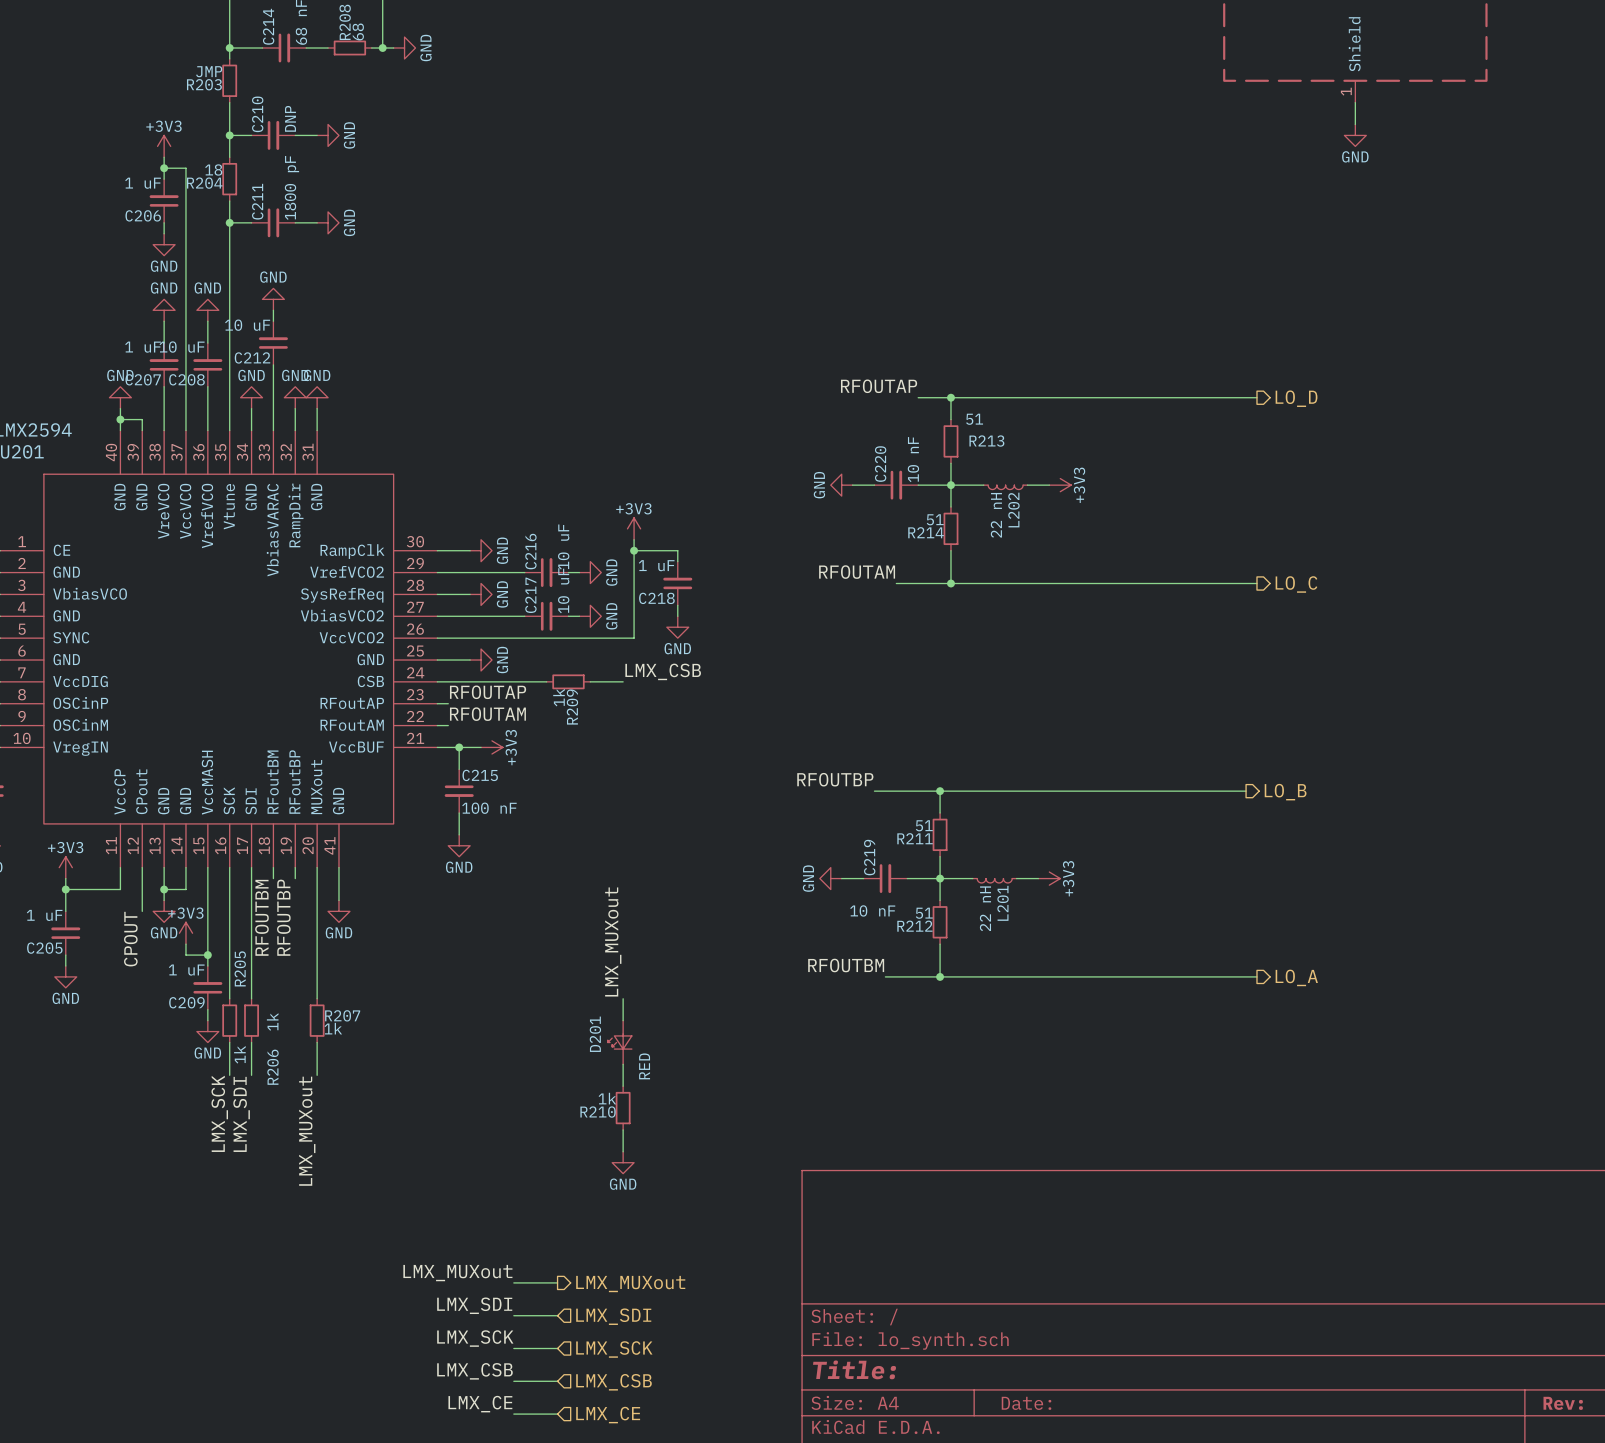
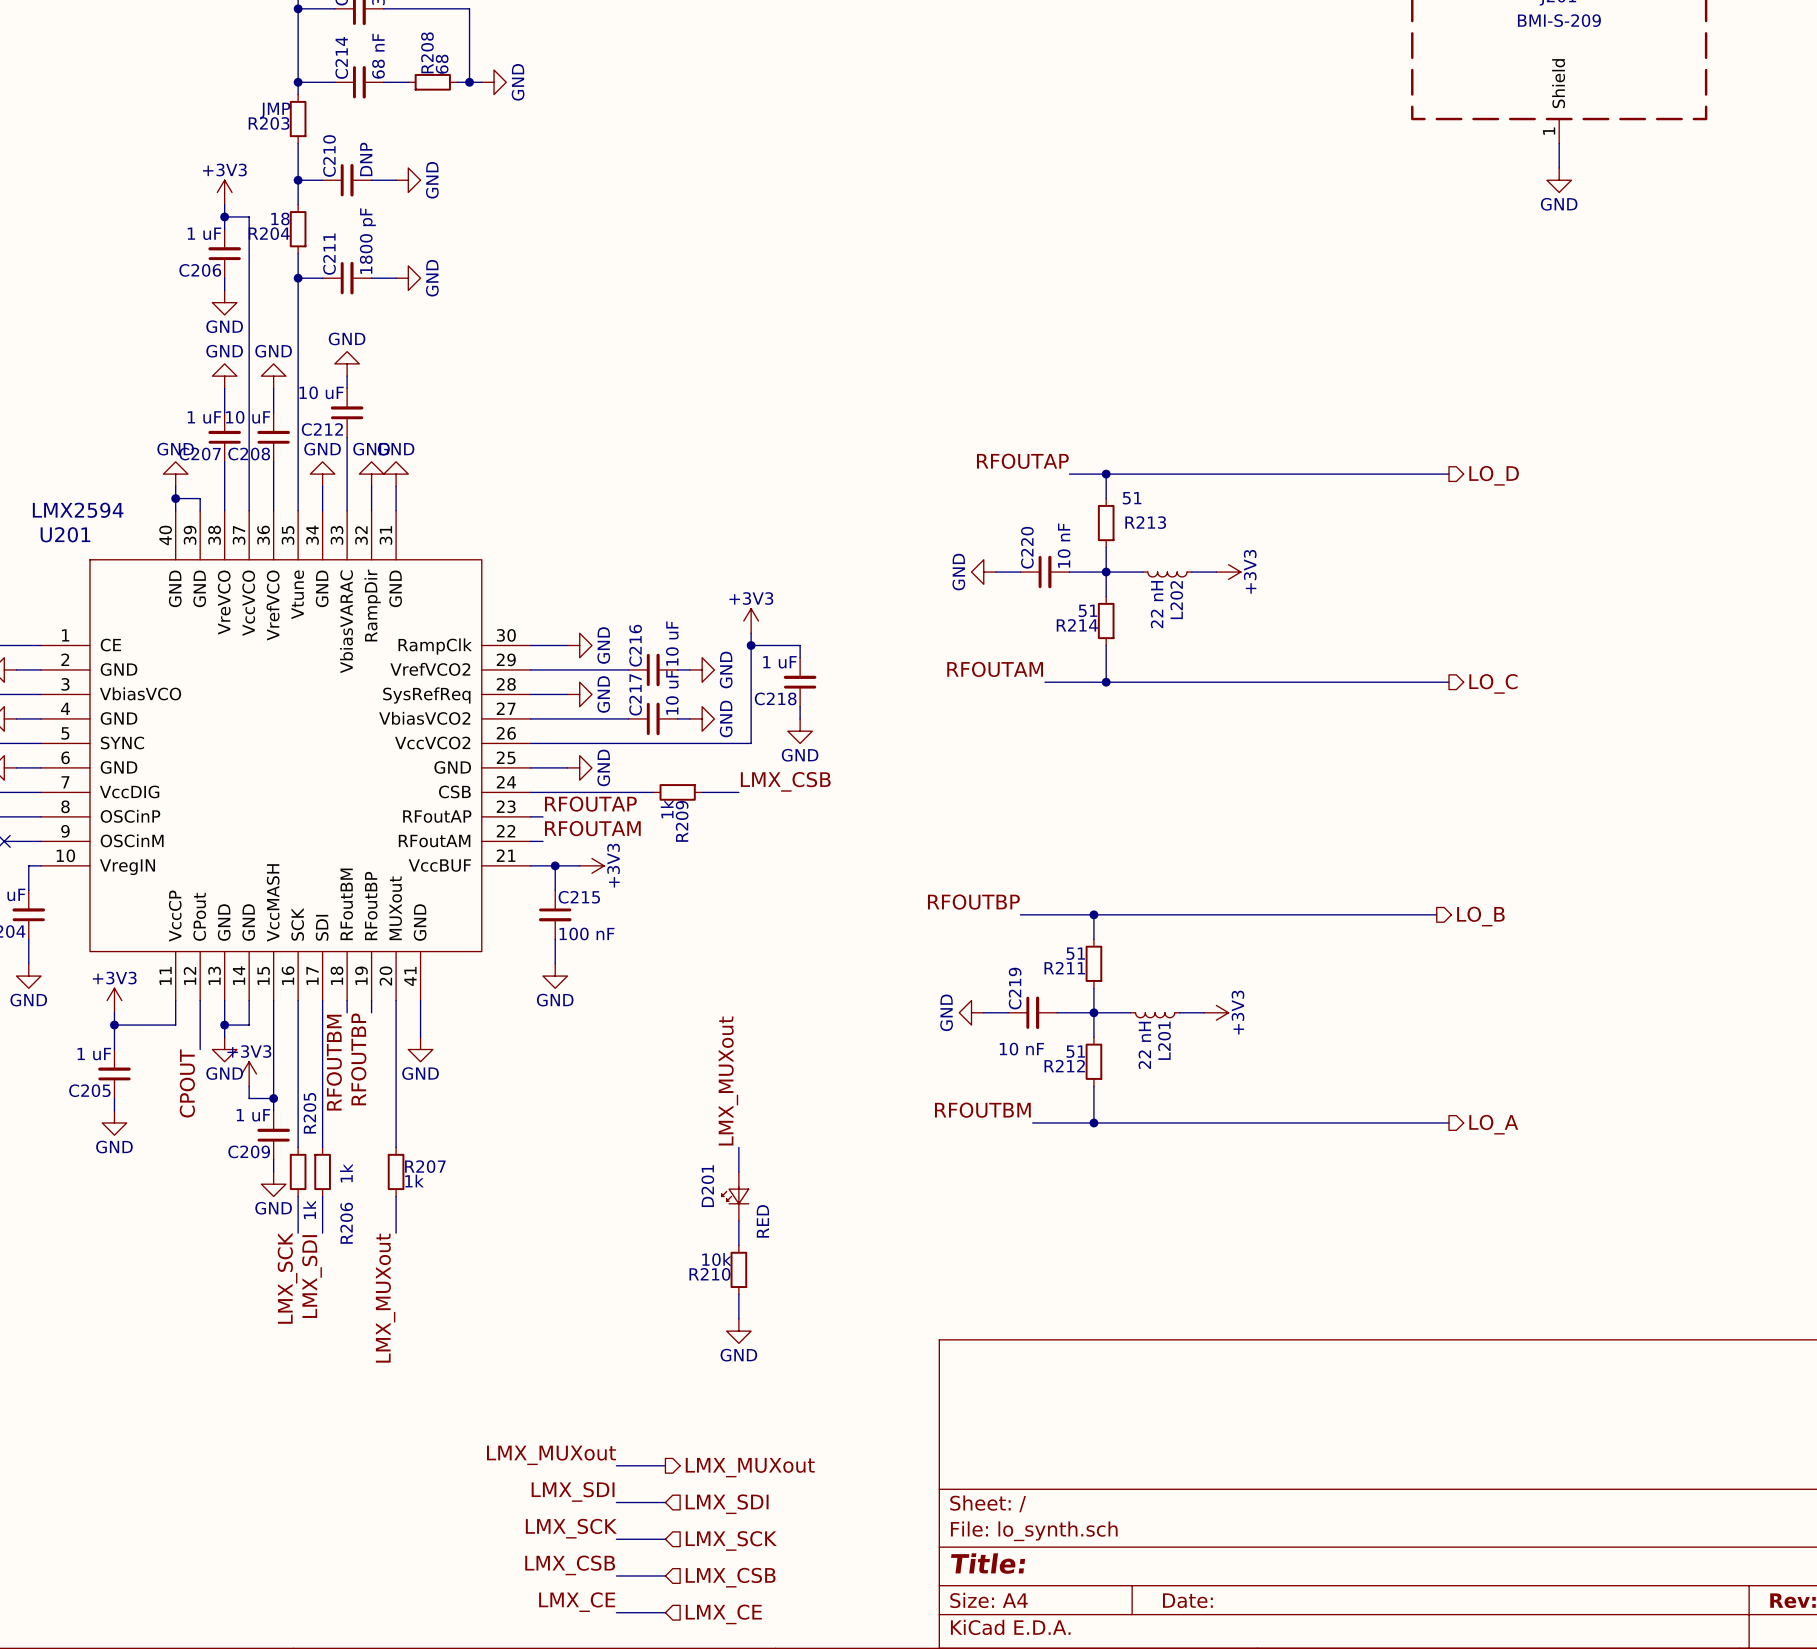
R210 value: 1k (607, 1098) -> 10k (716, 1259)

